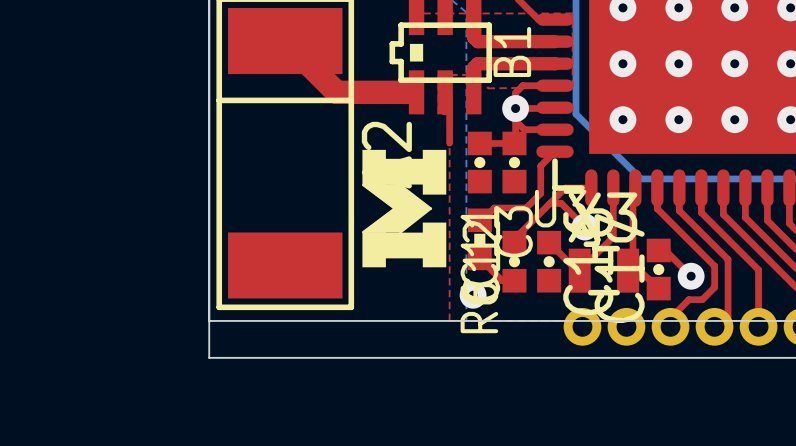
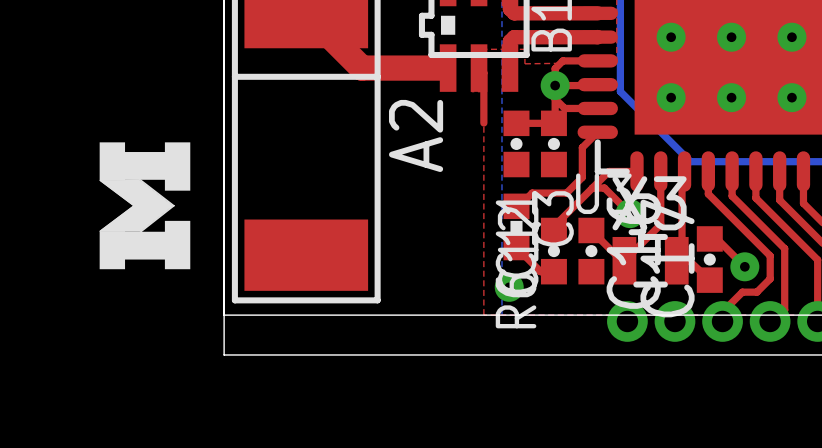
drawing position: (404, 208) -> (144, 205)

